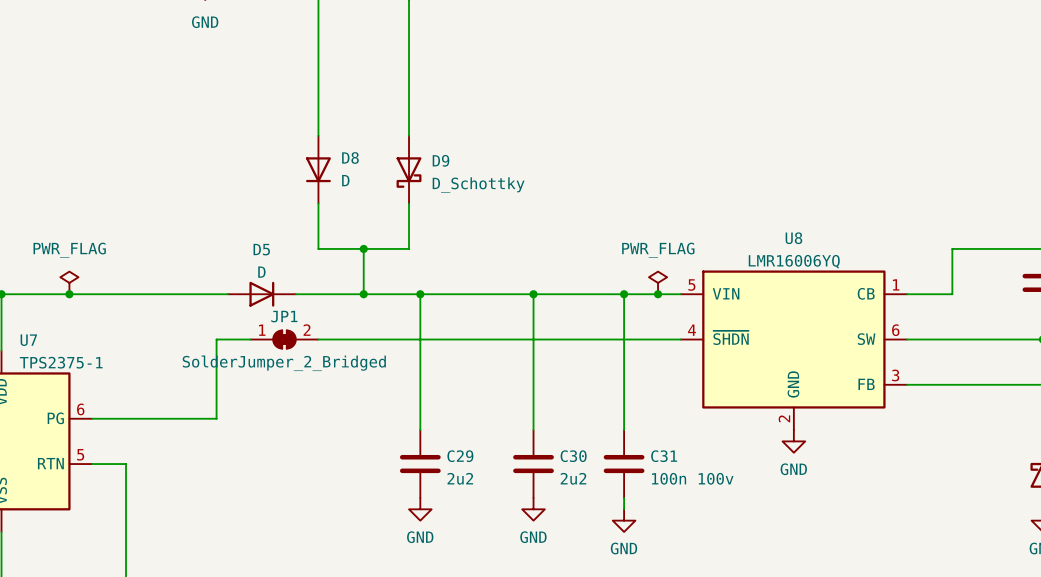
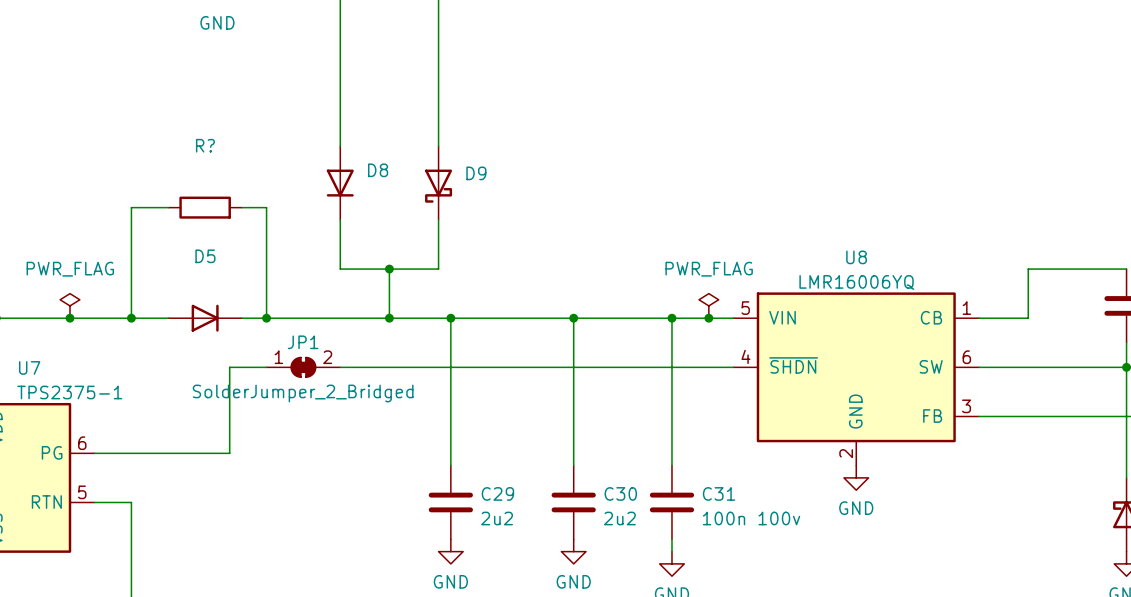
D8 value: D (345, 180) -> none
D9 value: D_Schottky (478, 185) -> none
wire: none -> (168, 207) (131, 207) (131, 318)
R?: none -> (205, 207)
wire: none -> (241, 207) (266, 207) (266, 318)
D5 name position: D5 (261, 249) -> D5 (205, 256)
D5 value: D (261, 272) -> none
junction: none -> (131, 318)
junction: none -> (266, 318)
D5 position: (261, 294) -> (205, 318)

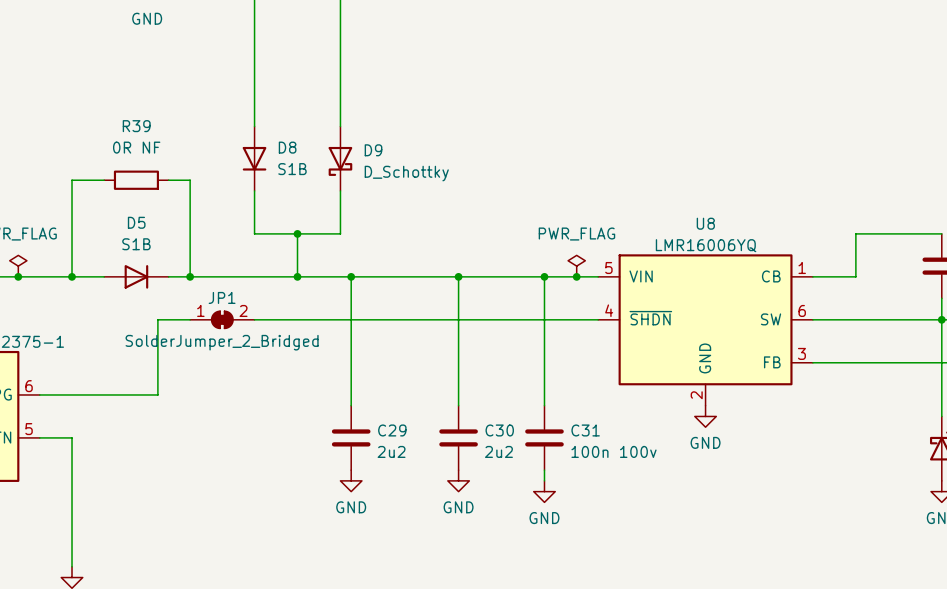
R? name: R? (205, 145) -> R39 (136, 126)
R? value: none -> 0R NF (136, 147)
D8 value: none -> S1B (292, 169)
D9 value: none -> D_Schottky (406, 173)
D5 value: none -> S1B (136, 244)

